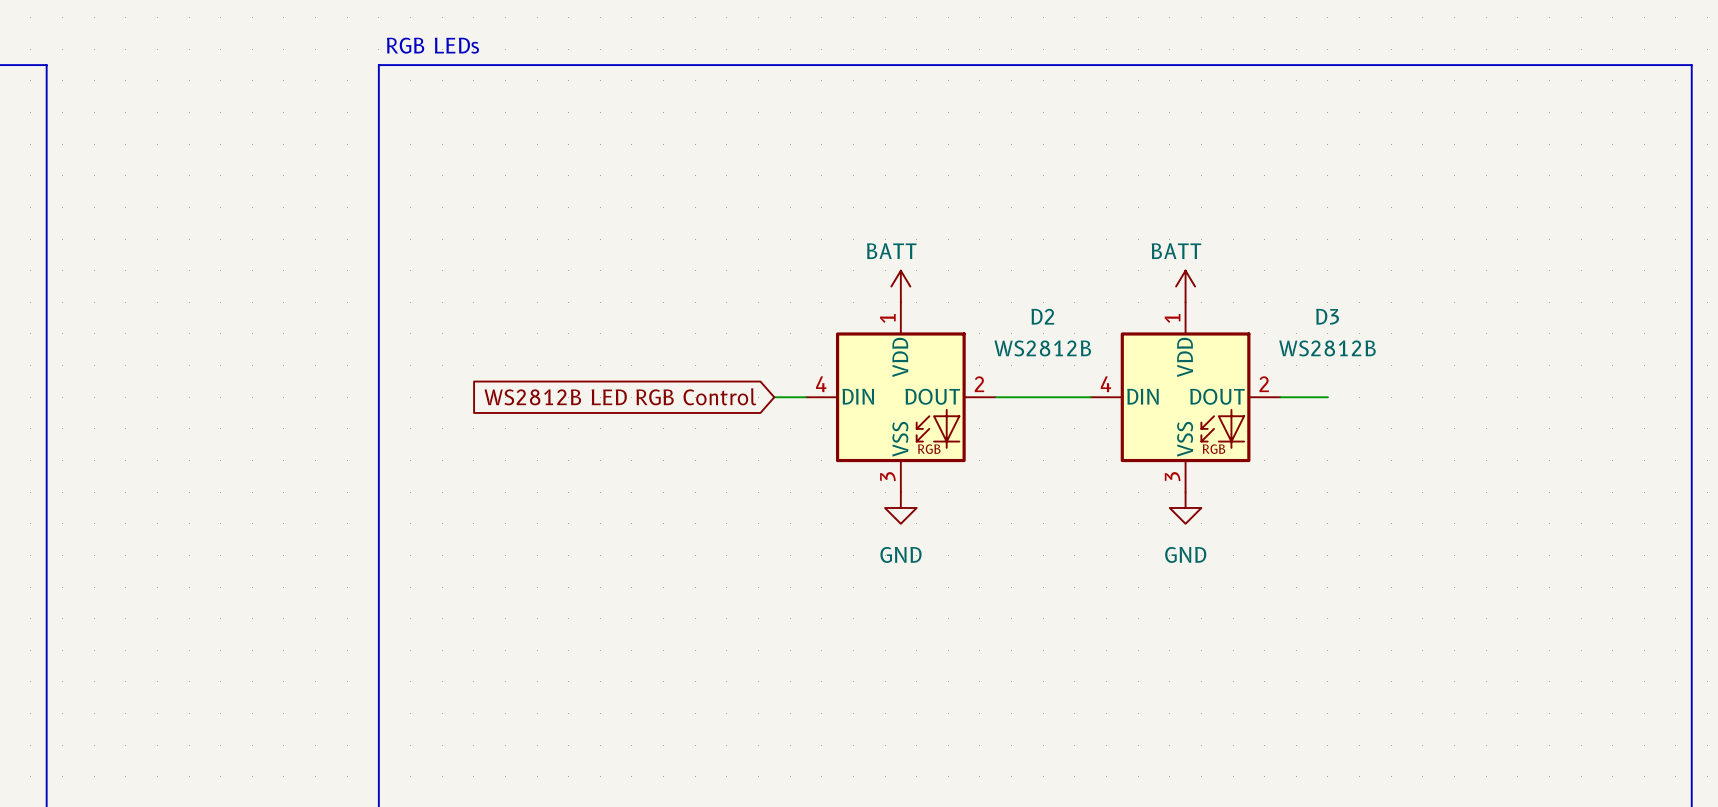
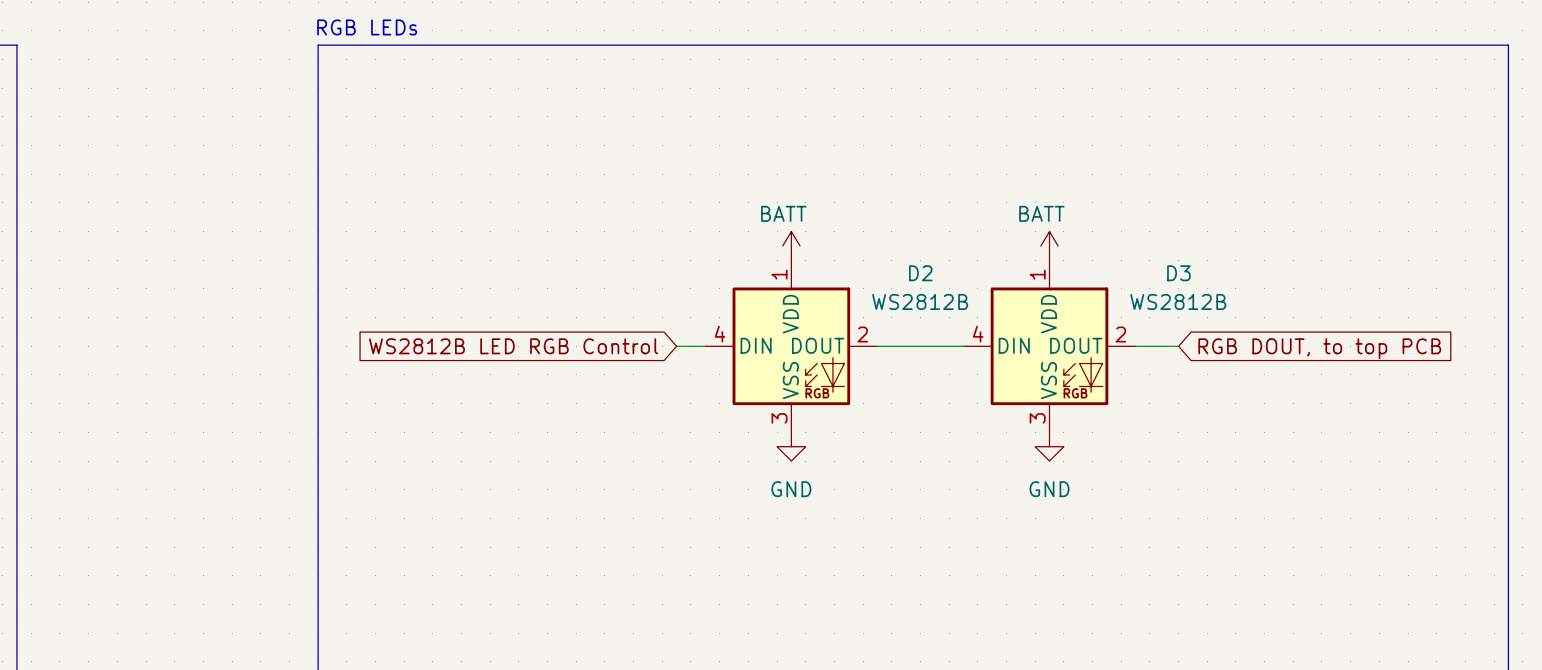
global label: none -> RGB DOUT, to top PCB (1319, 348)

